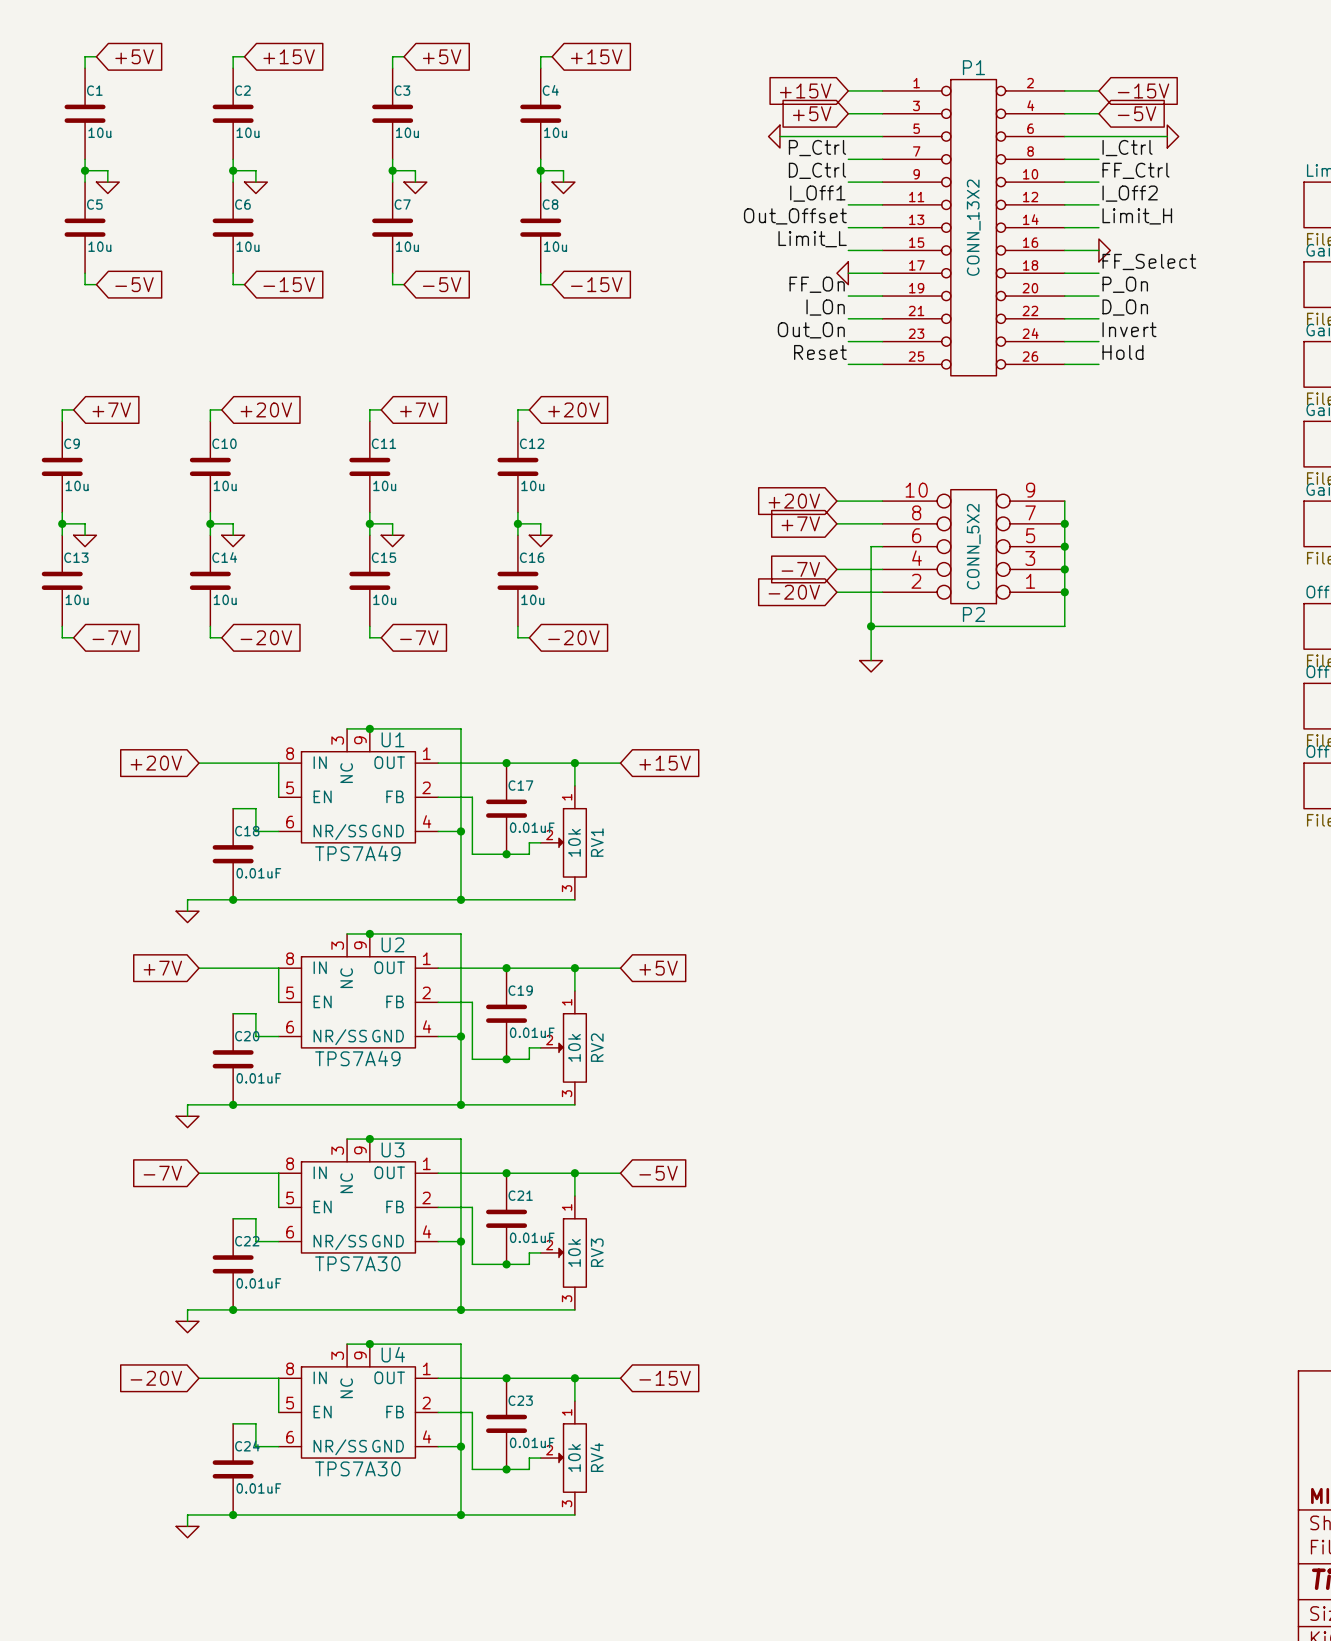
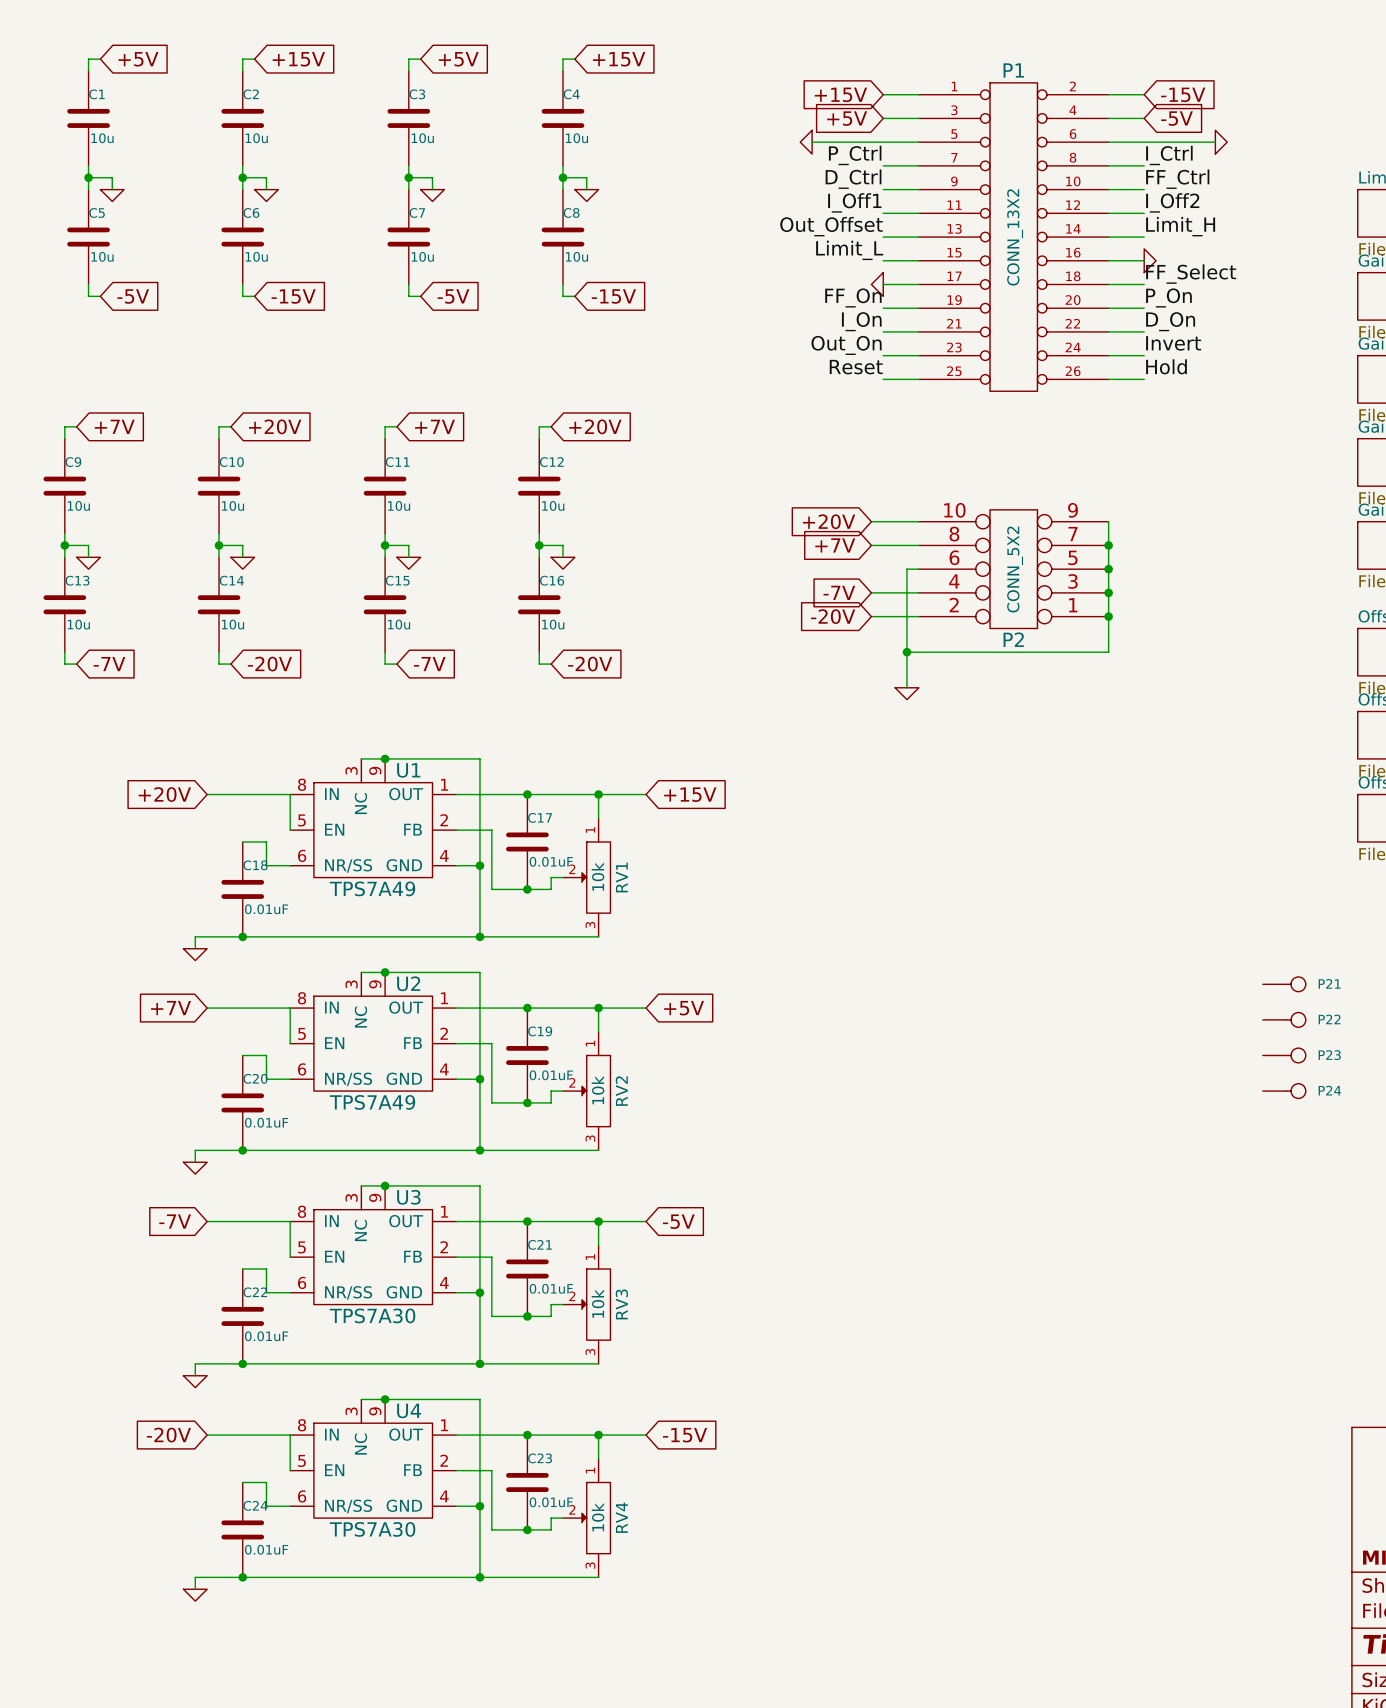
P21: none -> (1284, 984)
P22: none -> (1284, 1019)
P23: none -> (1284, 1055)
P24: none -> (1284, 1091)

